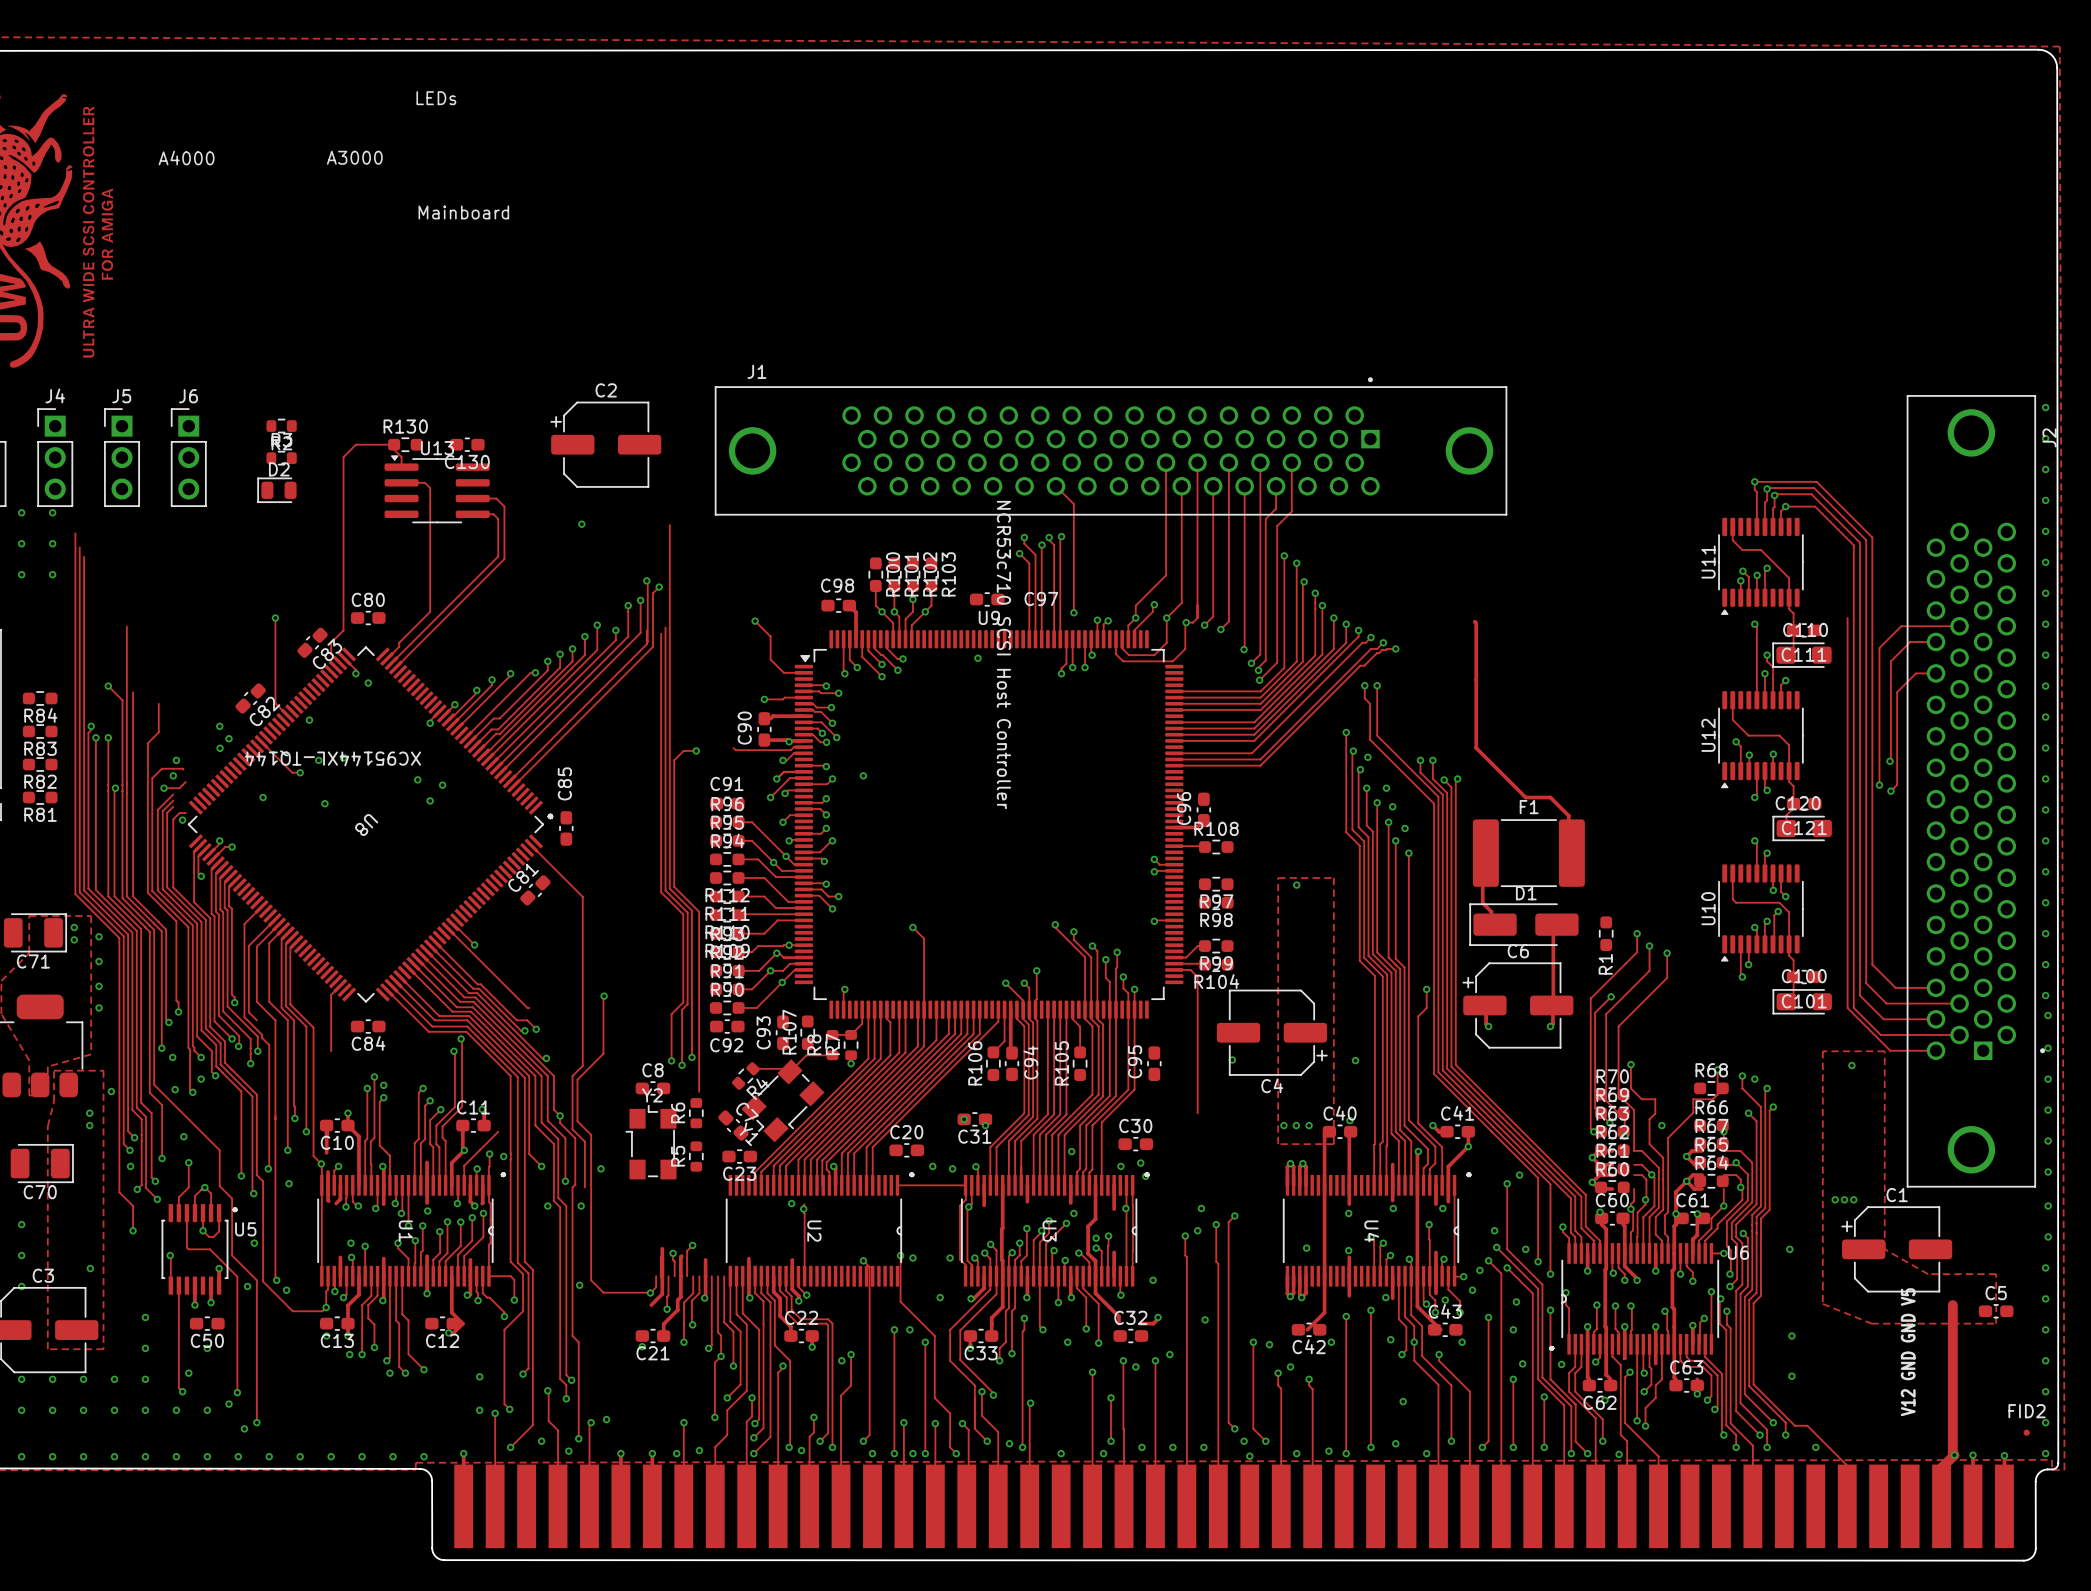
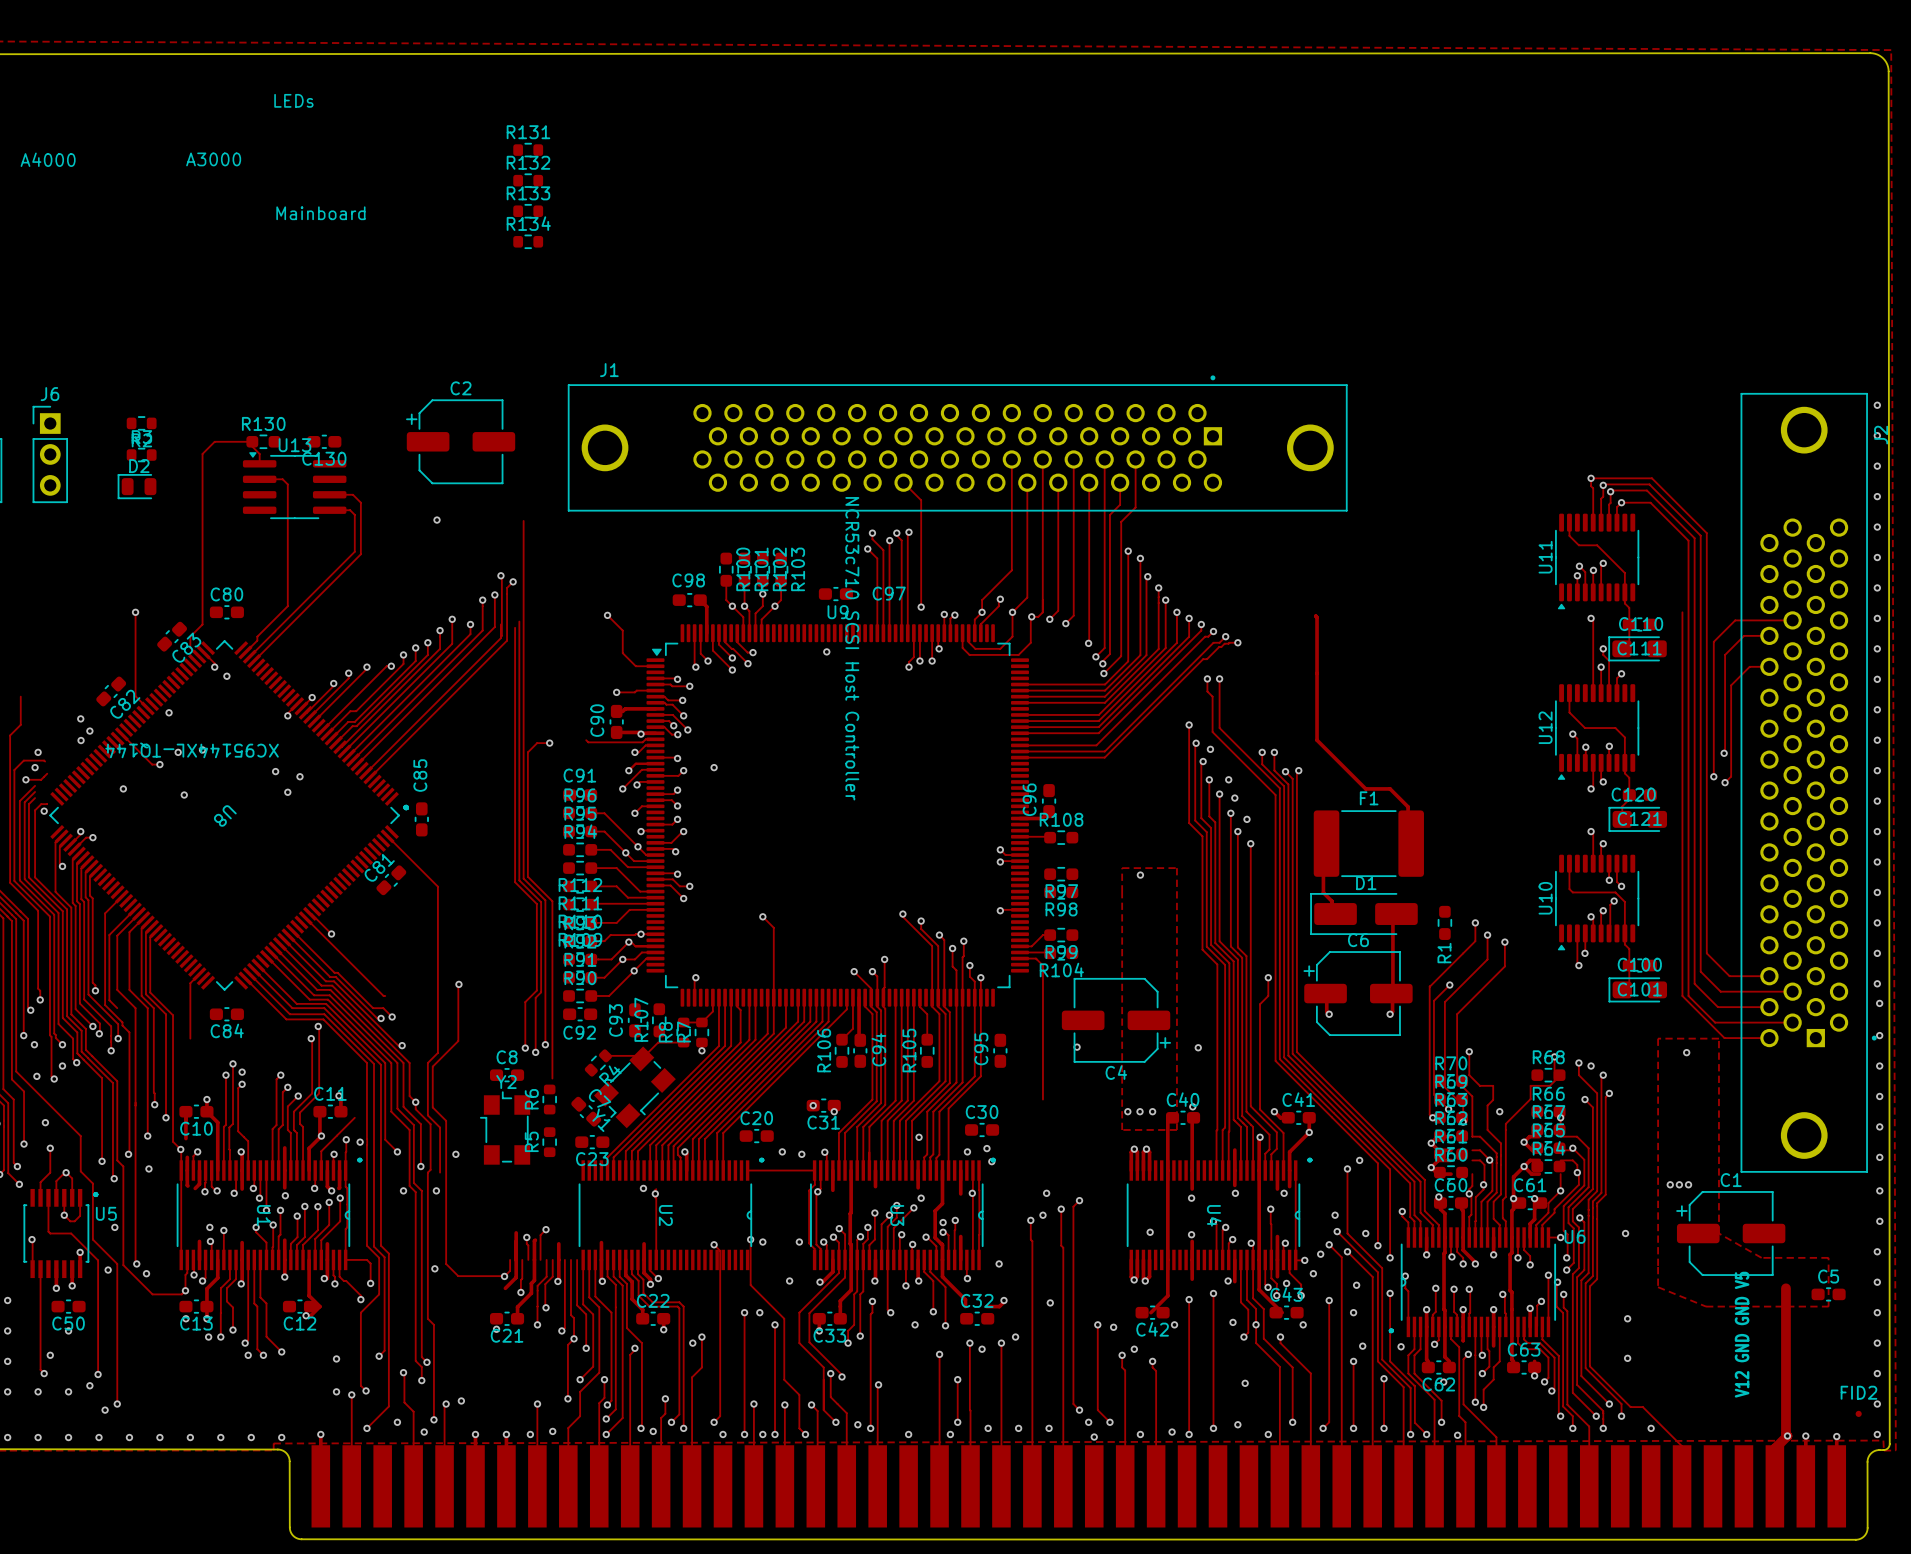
R131: none -> (528, 150)
R132: none -> (528, 180)
R133: none -> (528, 211)
R134: none -> (528, 241)

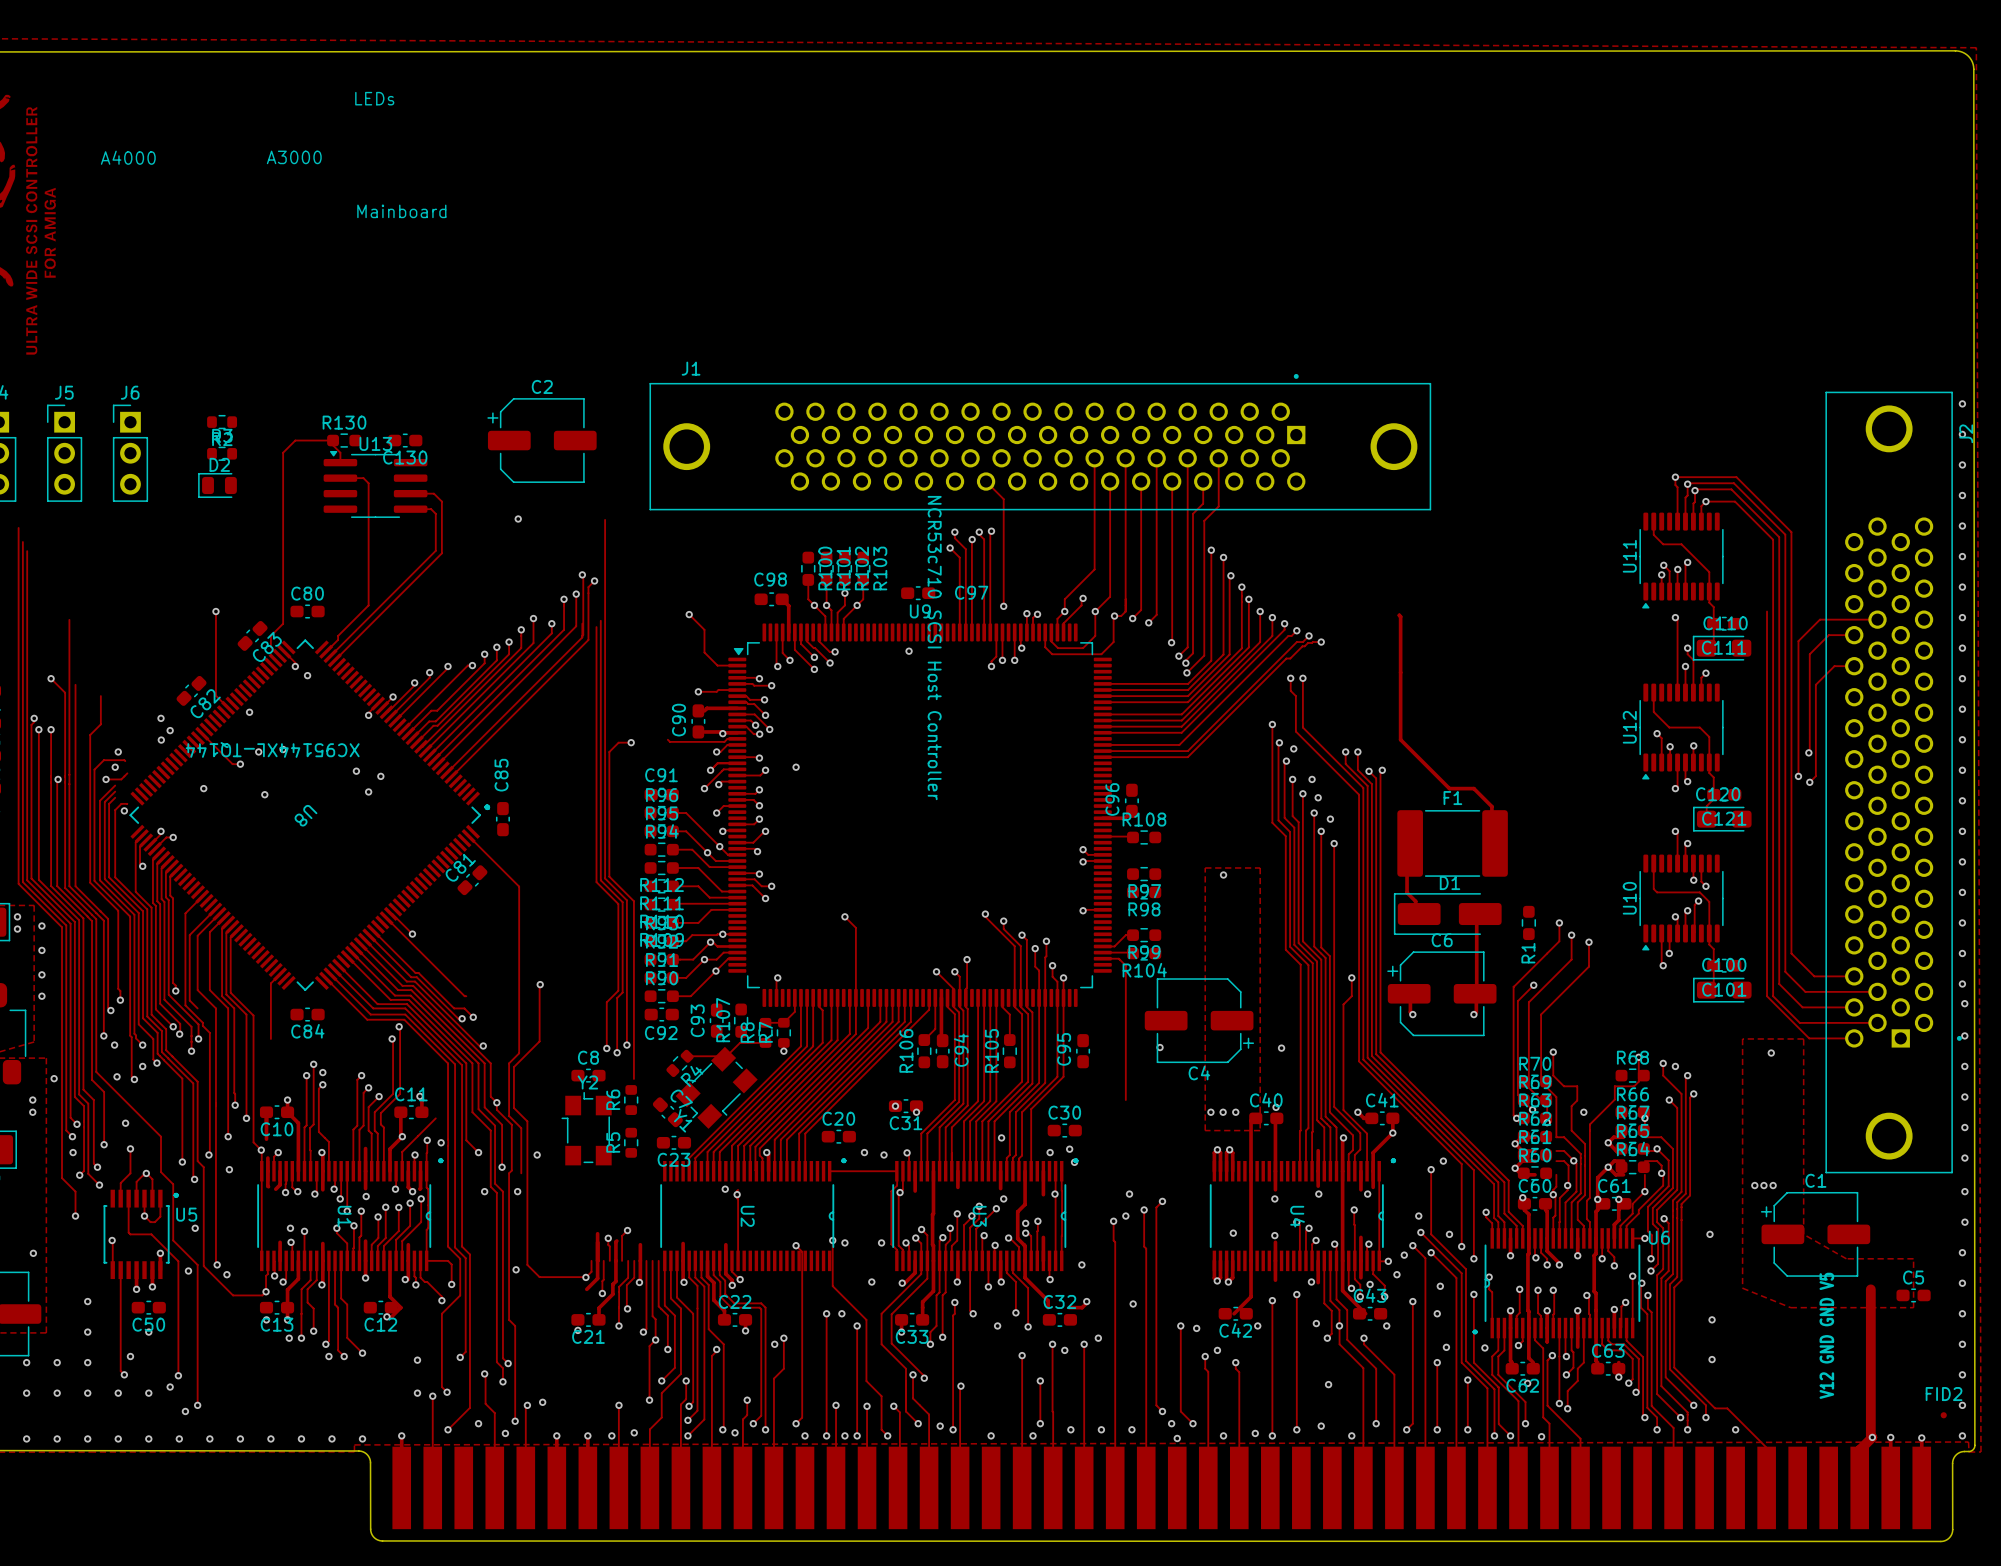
R131: (528, 150) -> none
R132: (528, 180) -> none
R133: (528, 211) -> none
R134: (528, 241) -> none

